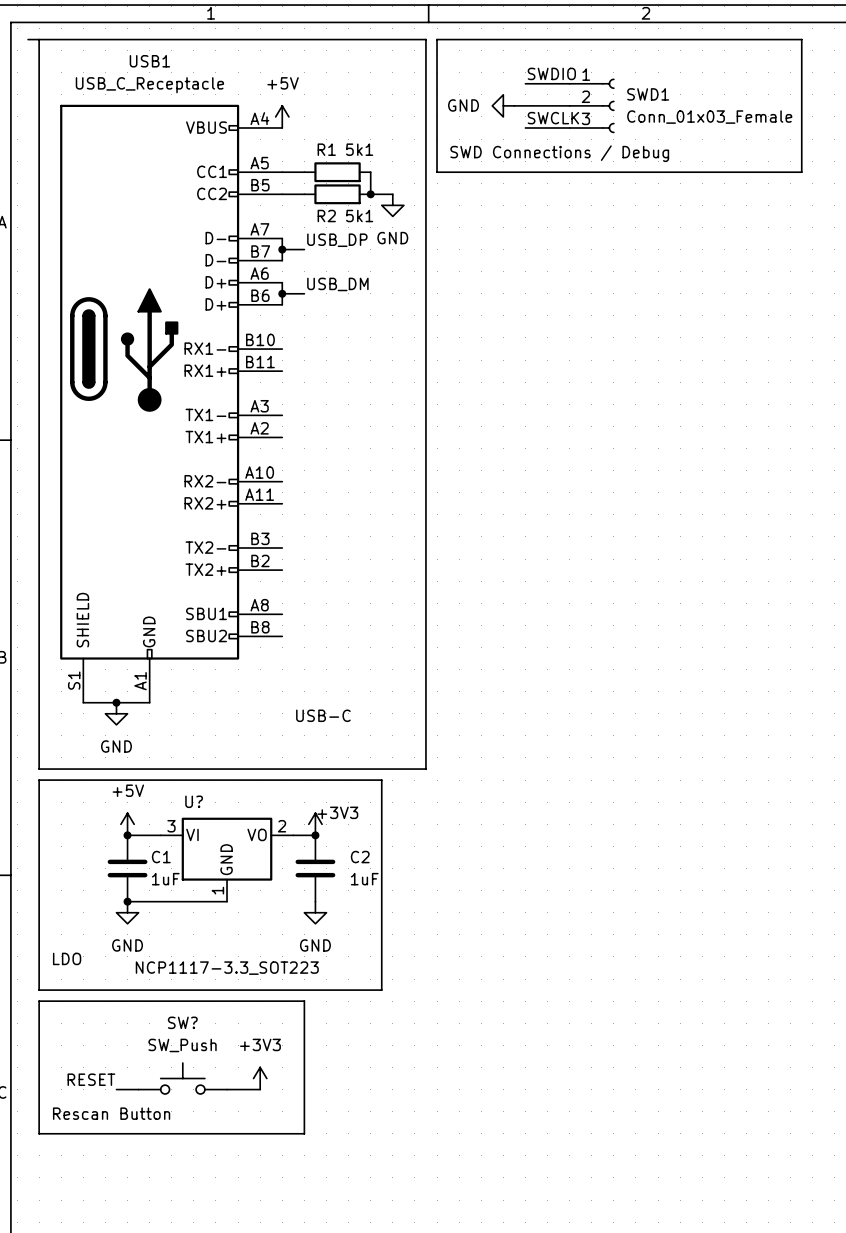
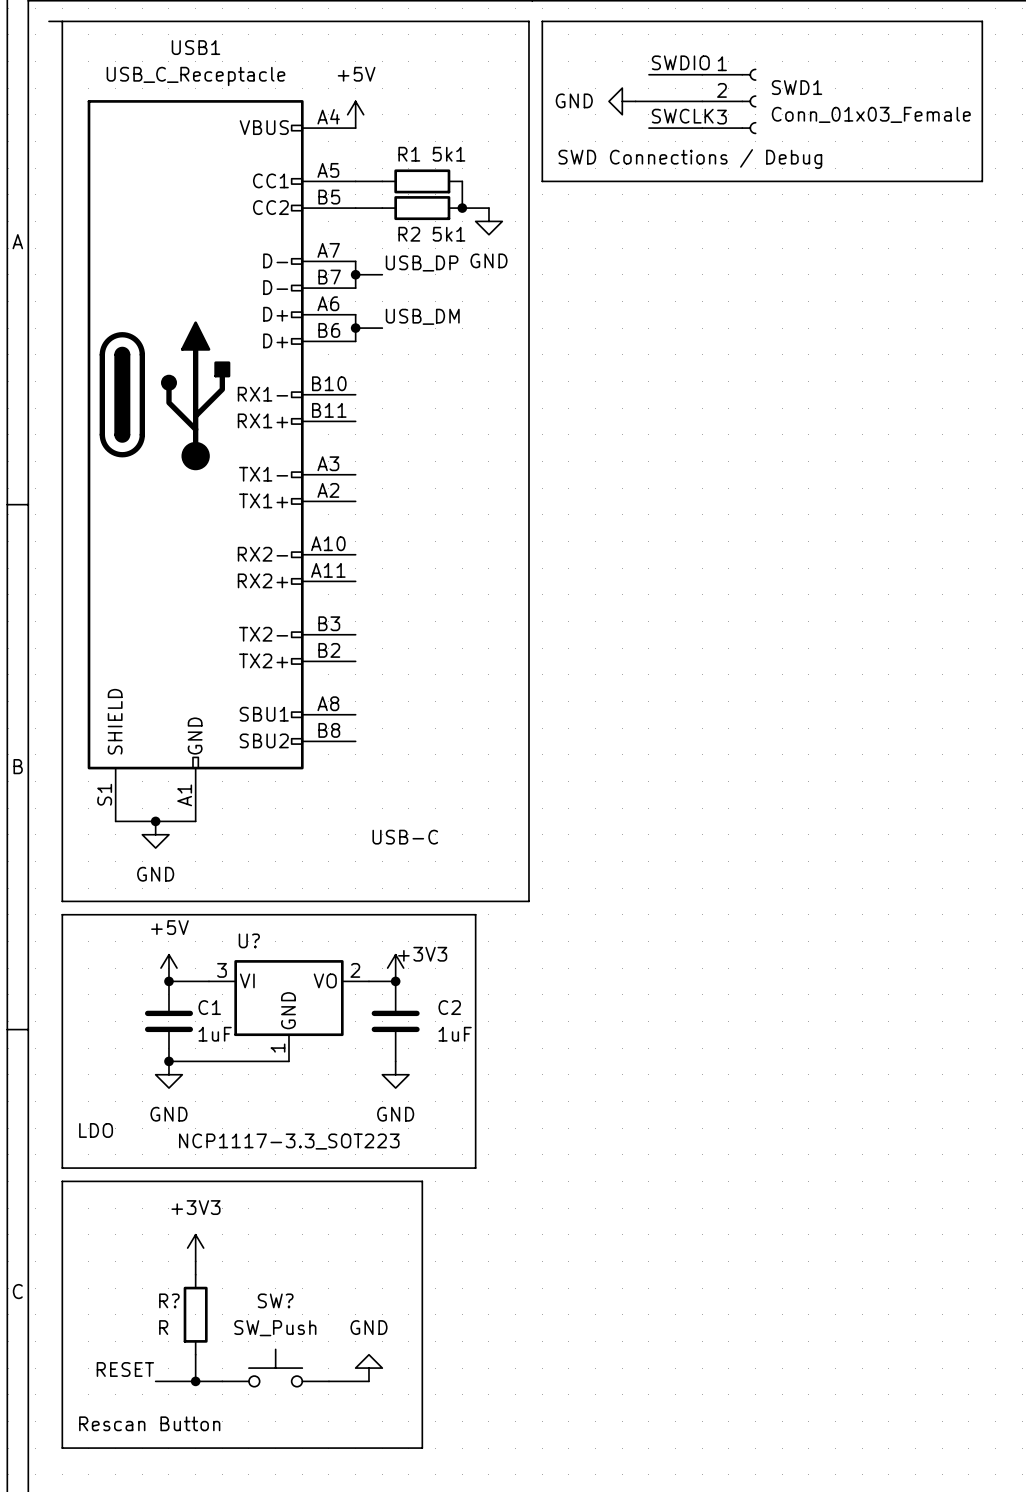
line: (304, 1001) (304, 1133) (39, 1133) -> (382, 1181) (422, 1181) (422, 1448) (62, 1448) (62, 1341)
wire: none -> (195, 1261) (195, 1274)
SW? position: (182, 1078) -> (275, 1368)
power symbol position: +3V3 (260, 1078) -> +3V3 (195, 1248)
label position: RESET (91, 1079) -> RESET (125, 1369)
wire: (116, 1089) (138, 1089) -> none
wire: (227, 1089) (260, 1089) -> (328, 1381) (368, 1381)
R?: none -> R (195, 1314)
text position: Rescan Button (111, 1113) -> Rescan Button (149, 1423)
wire: none -> (195, 1354) (195, 1381)
power symbol: none -> GND (368, 1368)
wire: none -> (155, 1381) (222, 1381)
junction: none -> (195, 1381)

